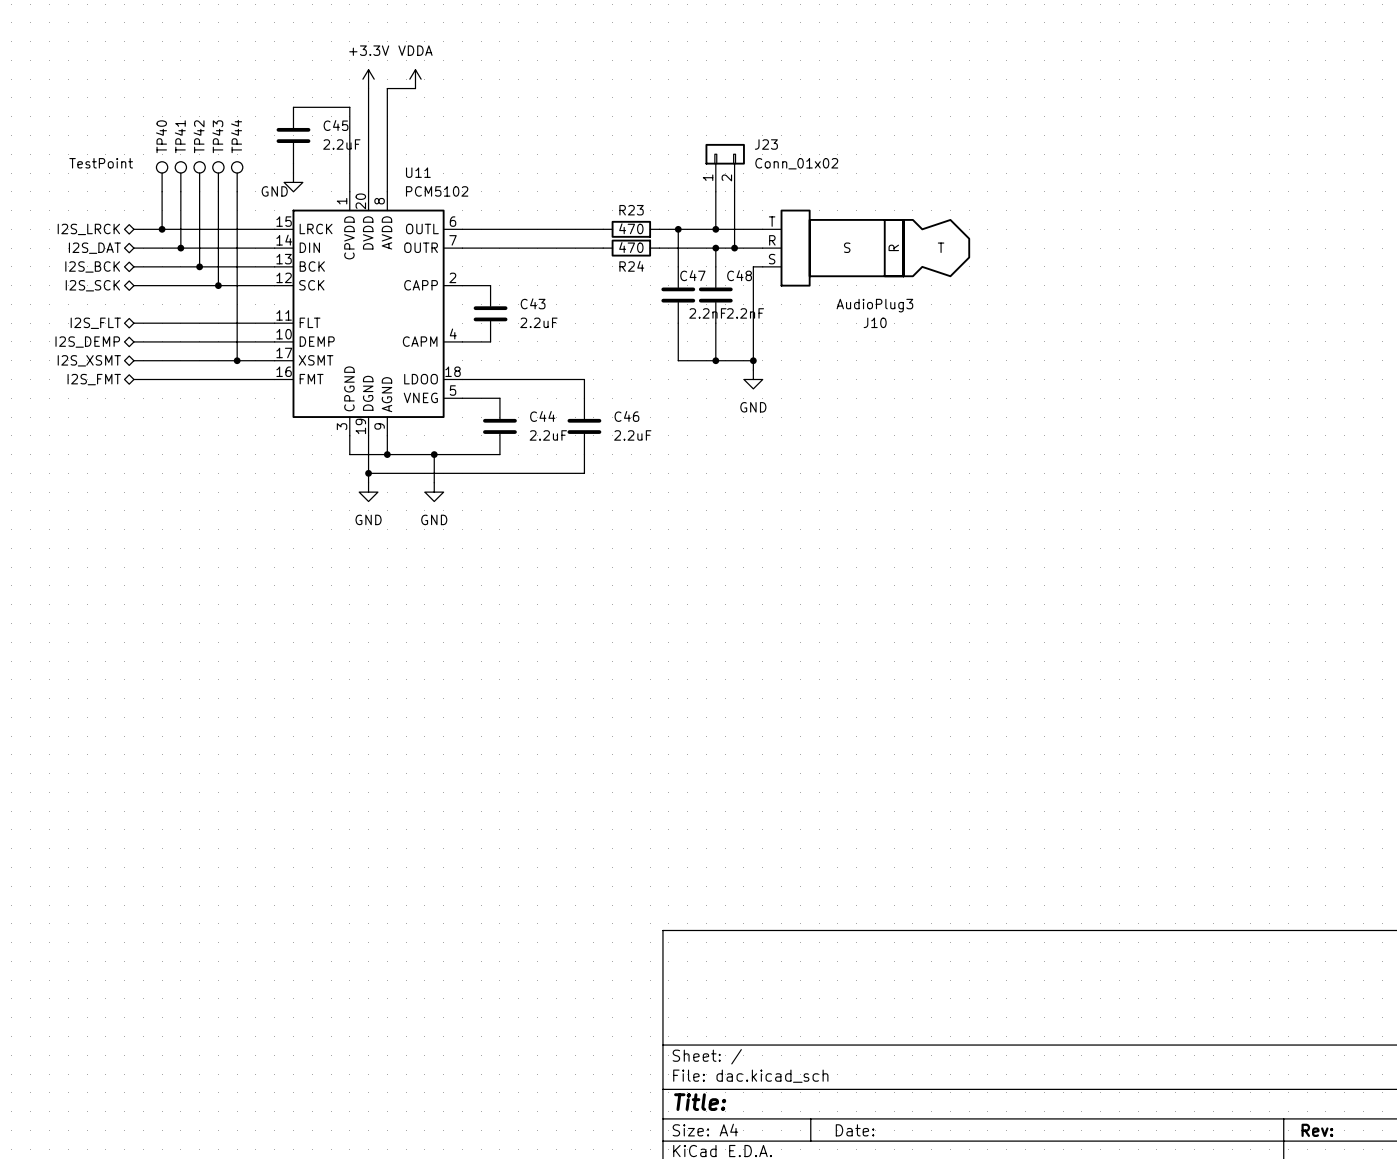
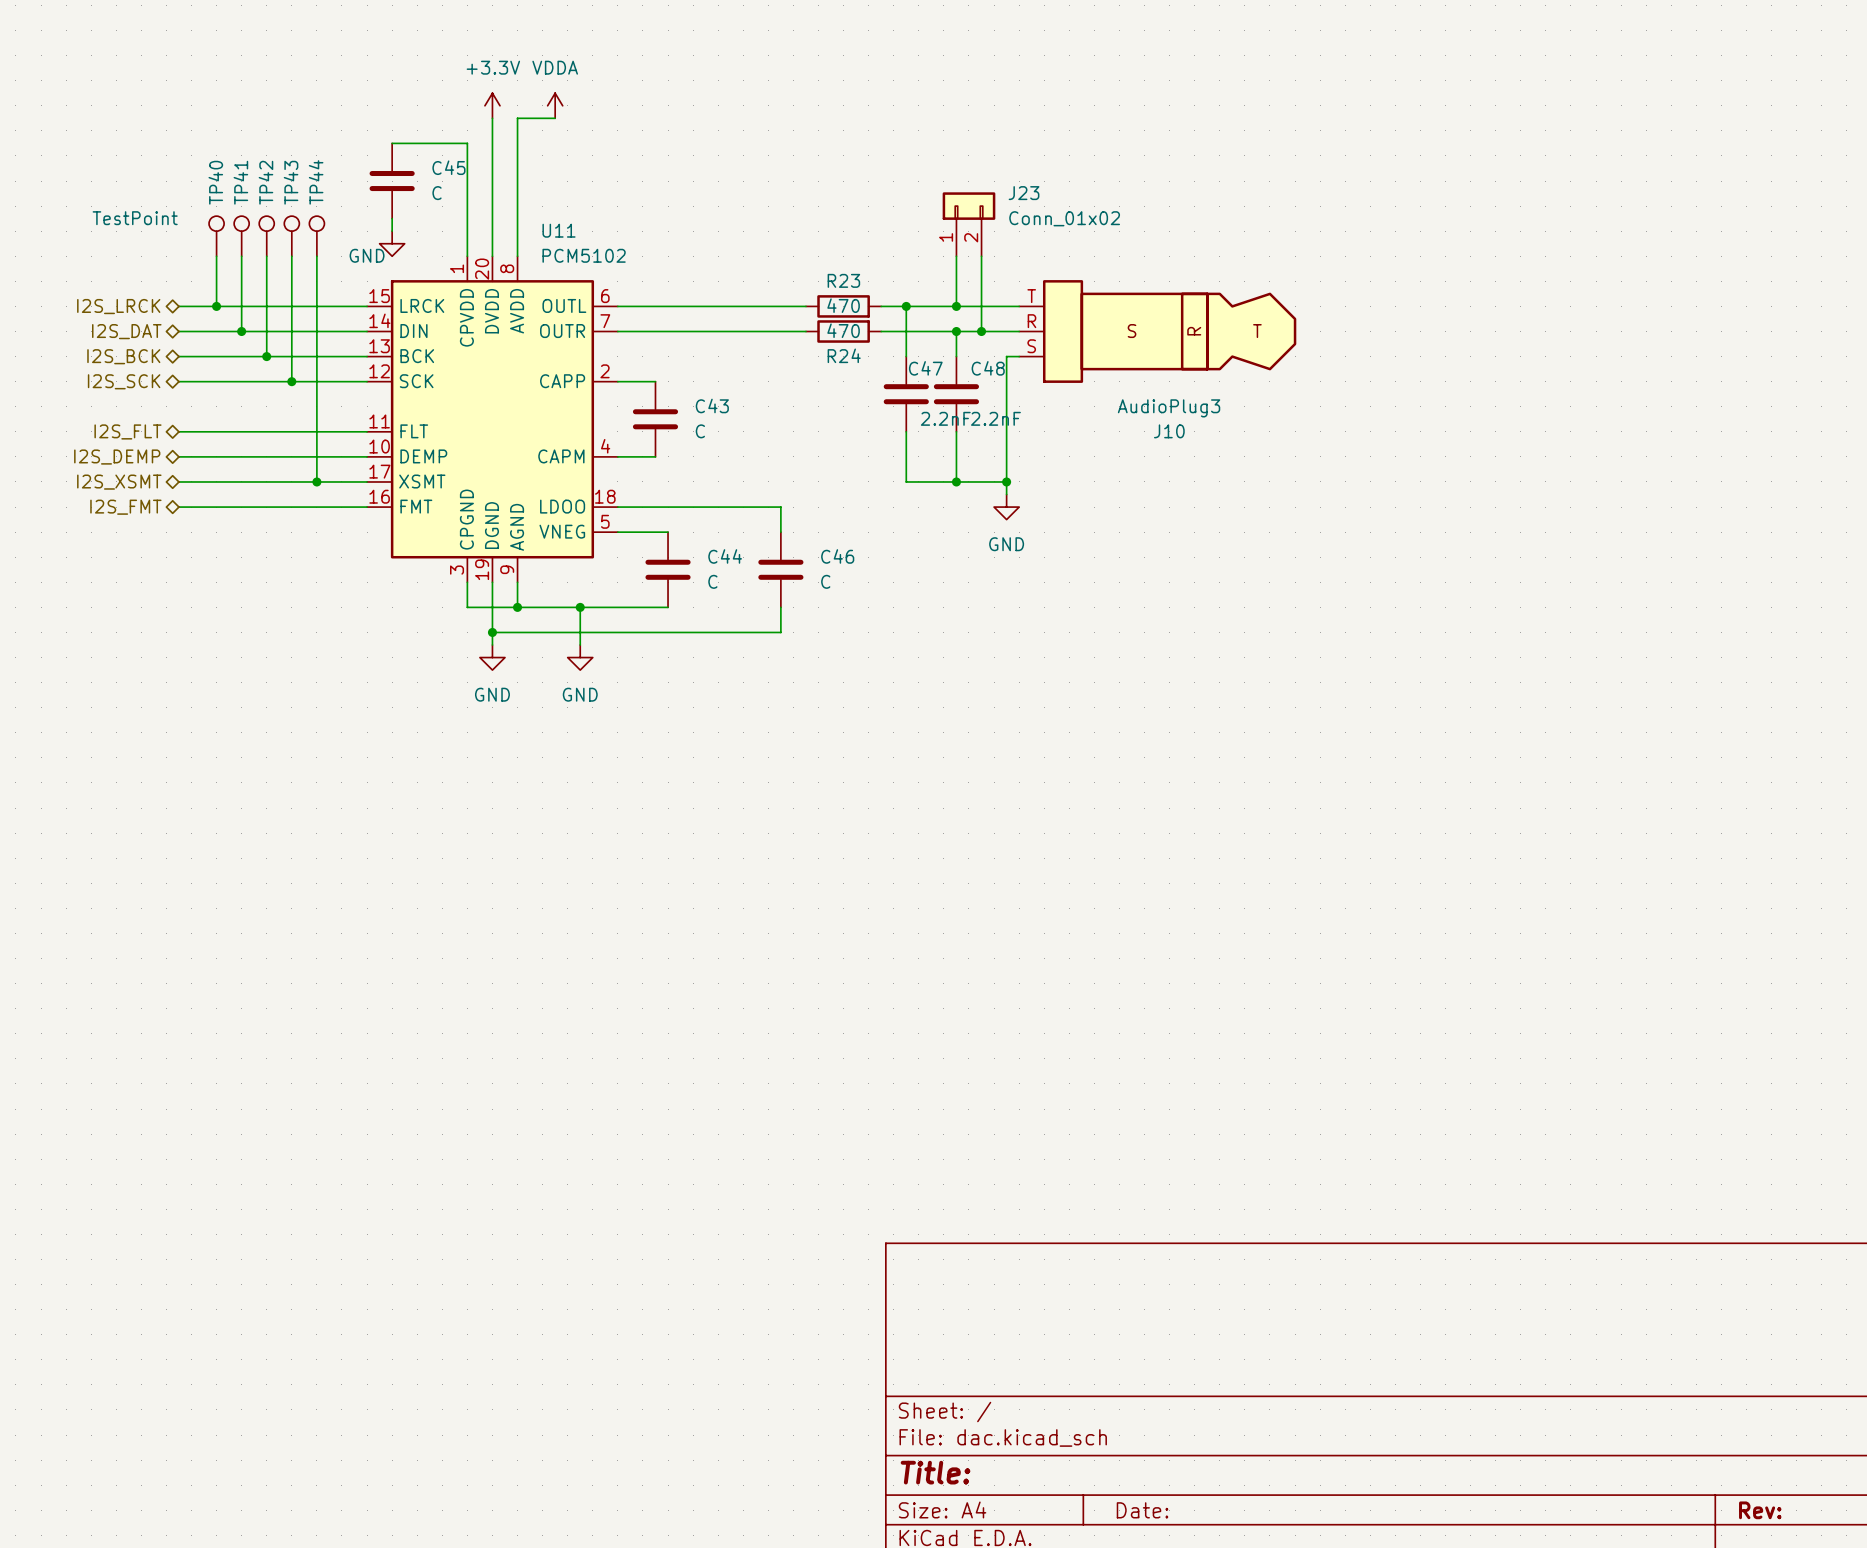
C45 value: 2.2uF (341, 144) -> C (437, 193)
C43 value: 2.2uF (538, 322) -> C (700, 431)
C44 value: 2.2uF (548, 435) -> C (712, 581)
C46 value: 2.2uF (632, 435) -> C (825, 581)

